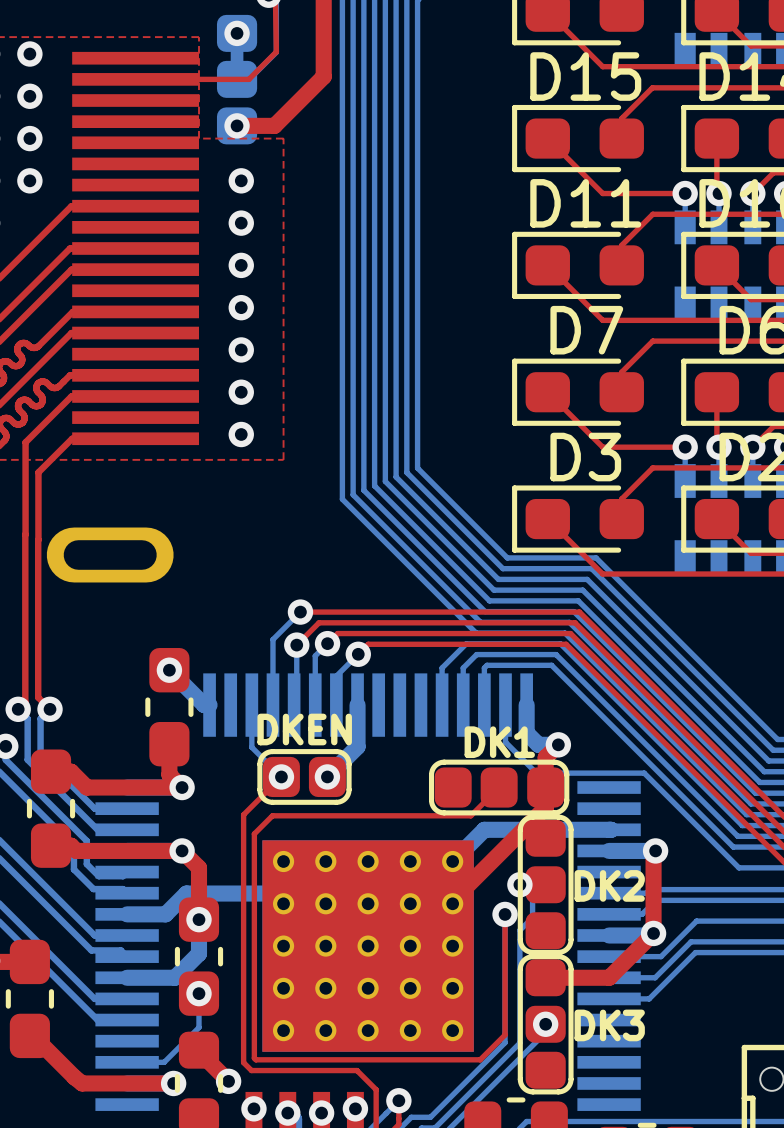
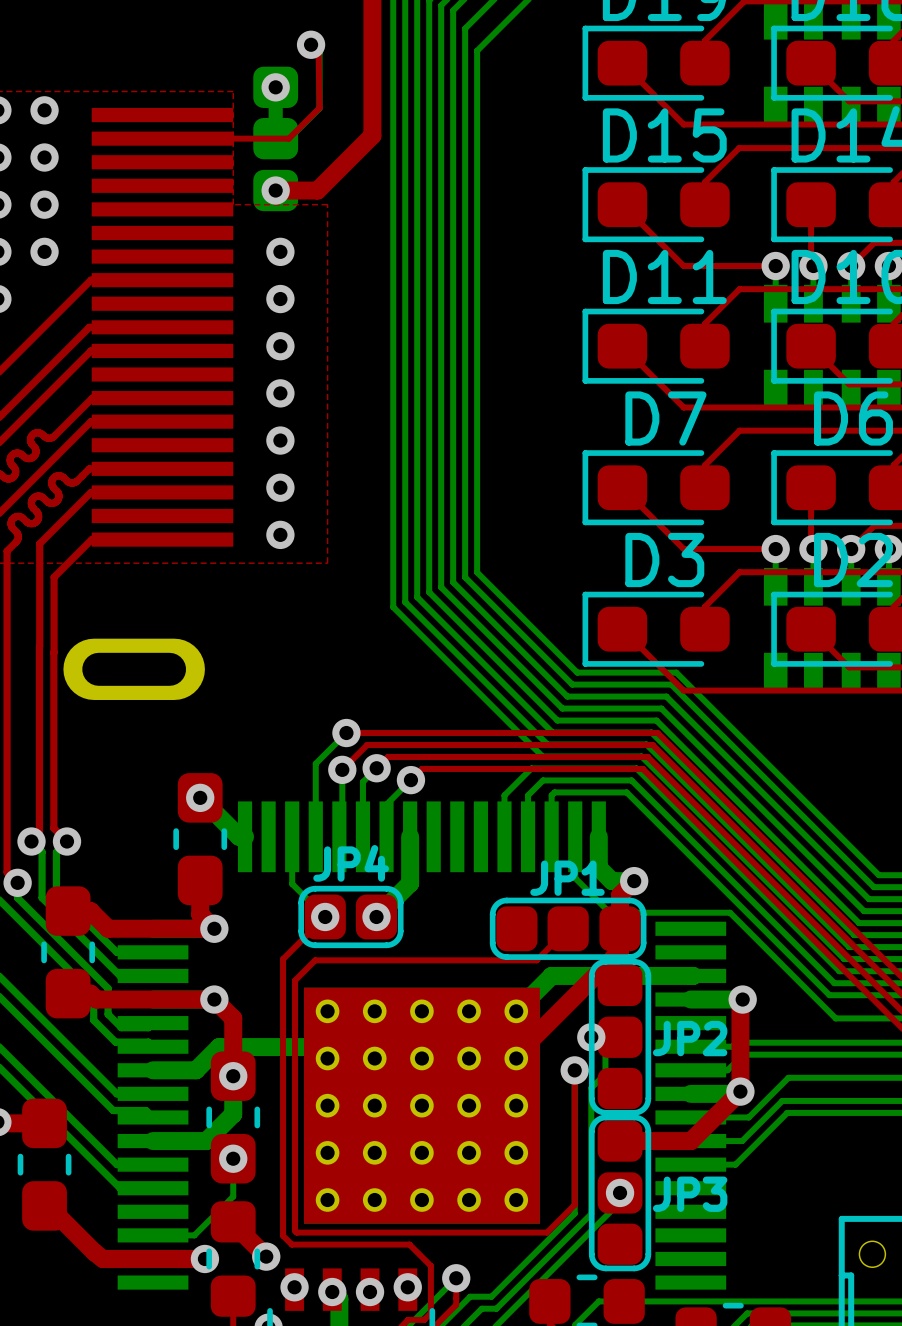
DKEN name: DKEN (304, 729) -> JP4 (351, 863)
DK1 name: DK1 (499, 742) -> JP1 (567, 878)
DK2 name: DK2 (609, 885) -> JP2 (690, 1038)
DK3 name: DK3 (609, 1025) -> JP3 (690, 1194)

